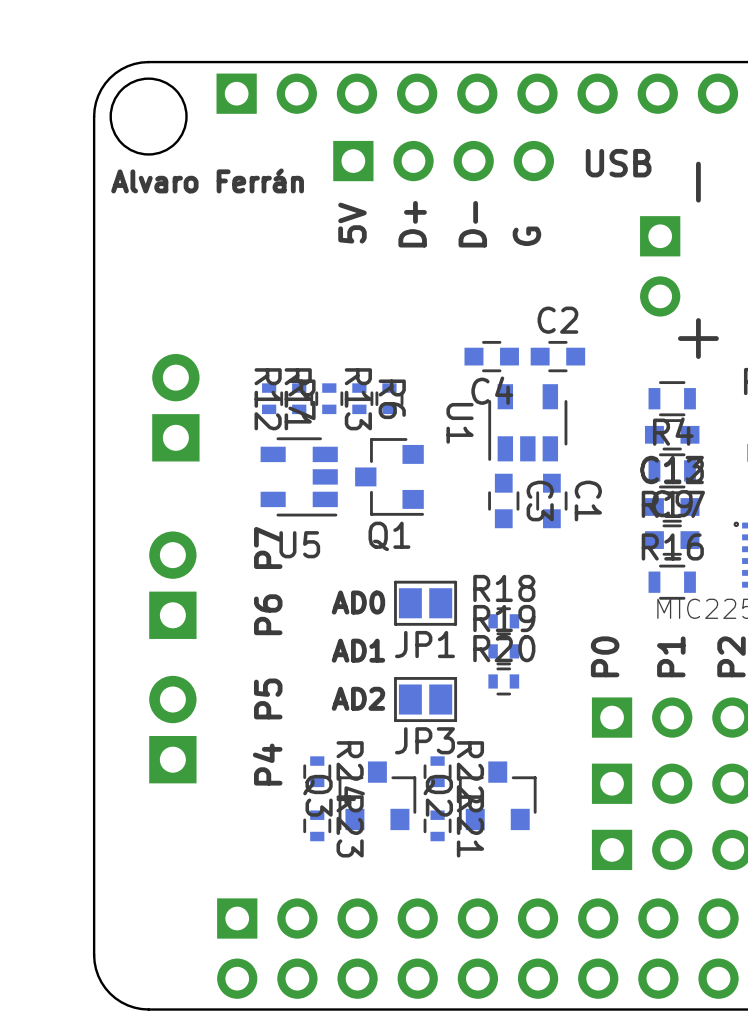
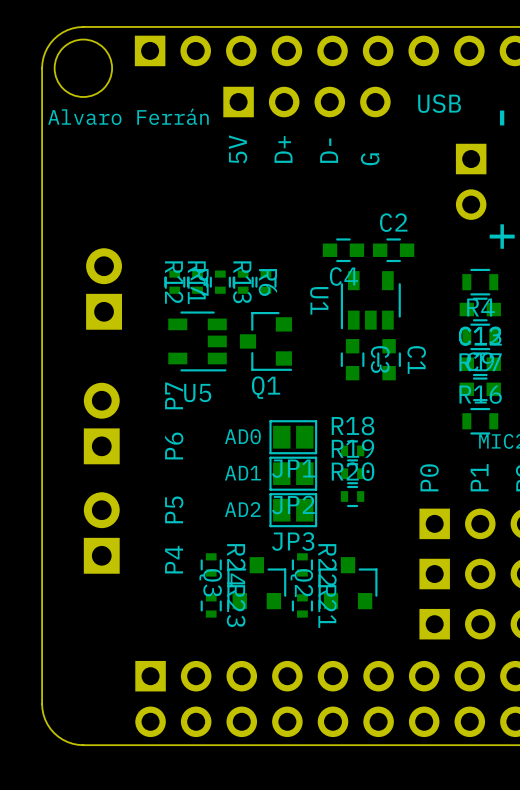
JP2: none -> (293, 473)

